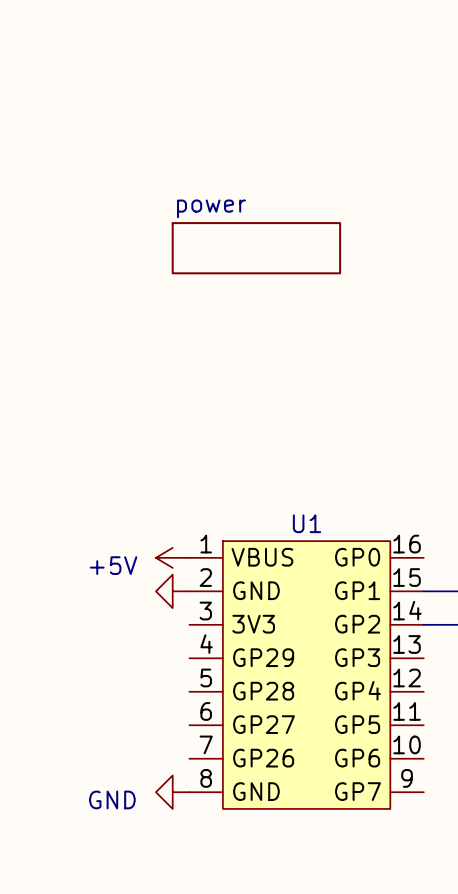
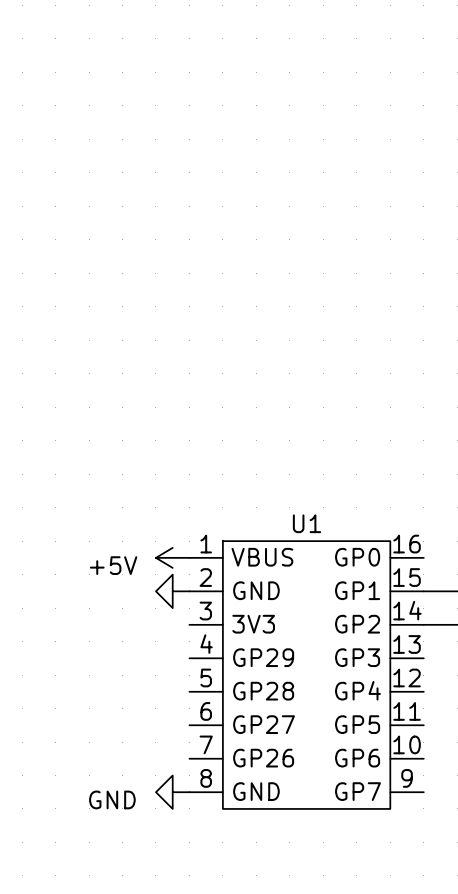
sheet power: (256, 248) -> none

